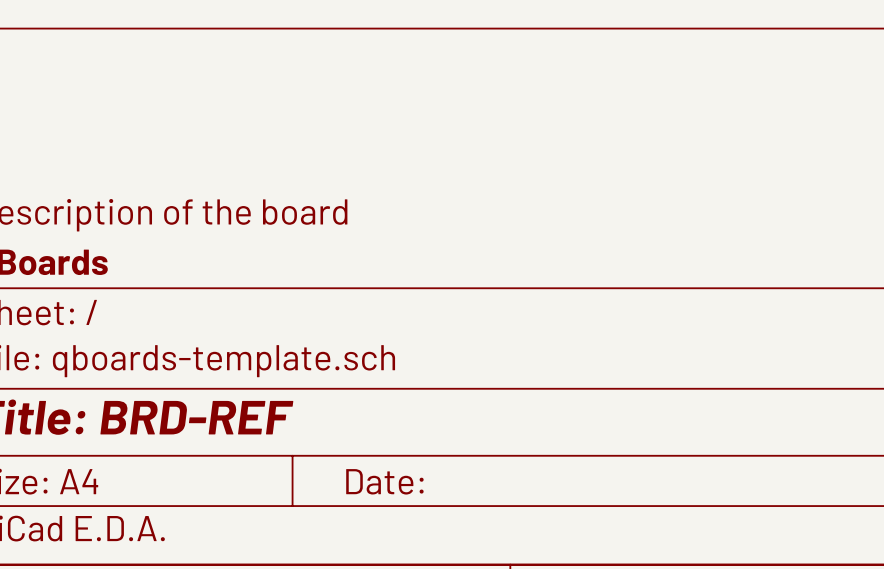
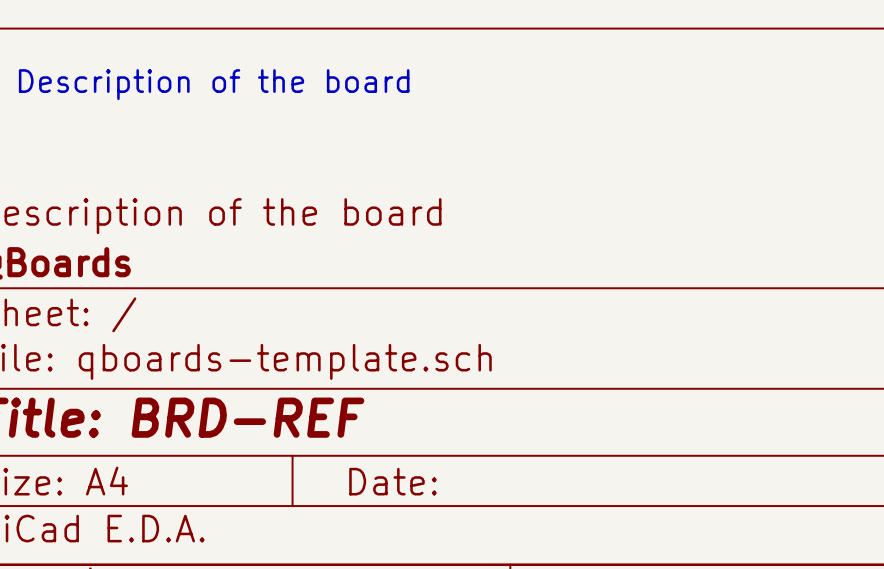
text: none -> Description of the board (214, 84)

